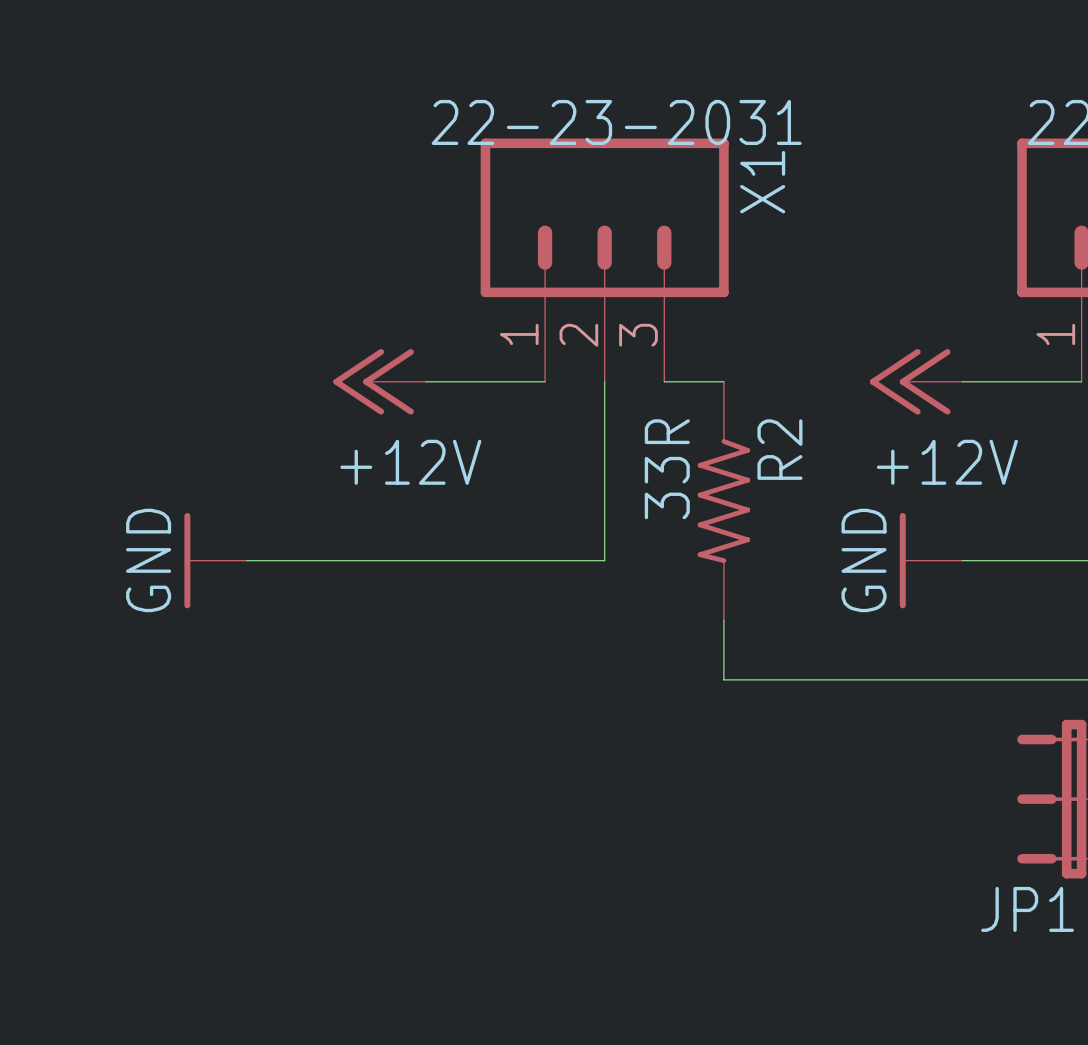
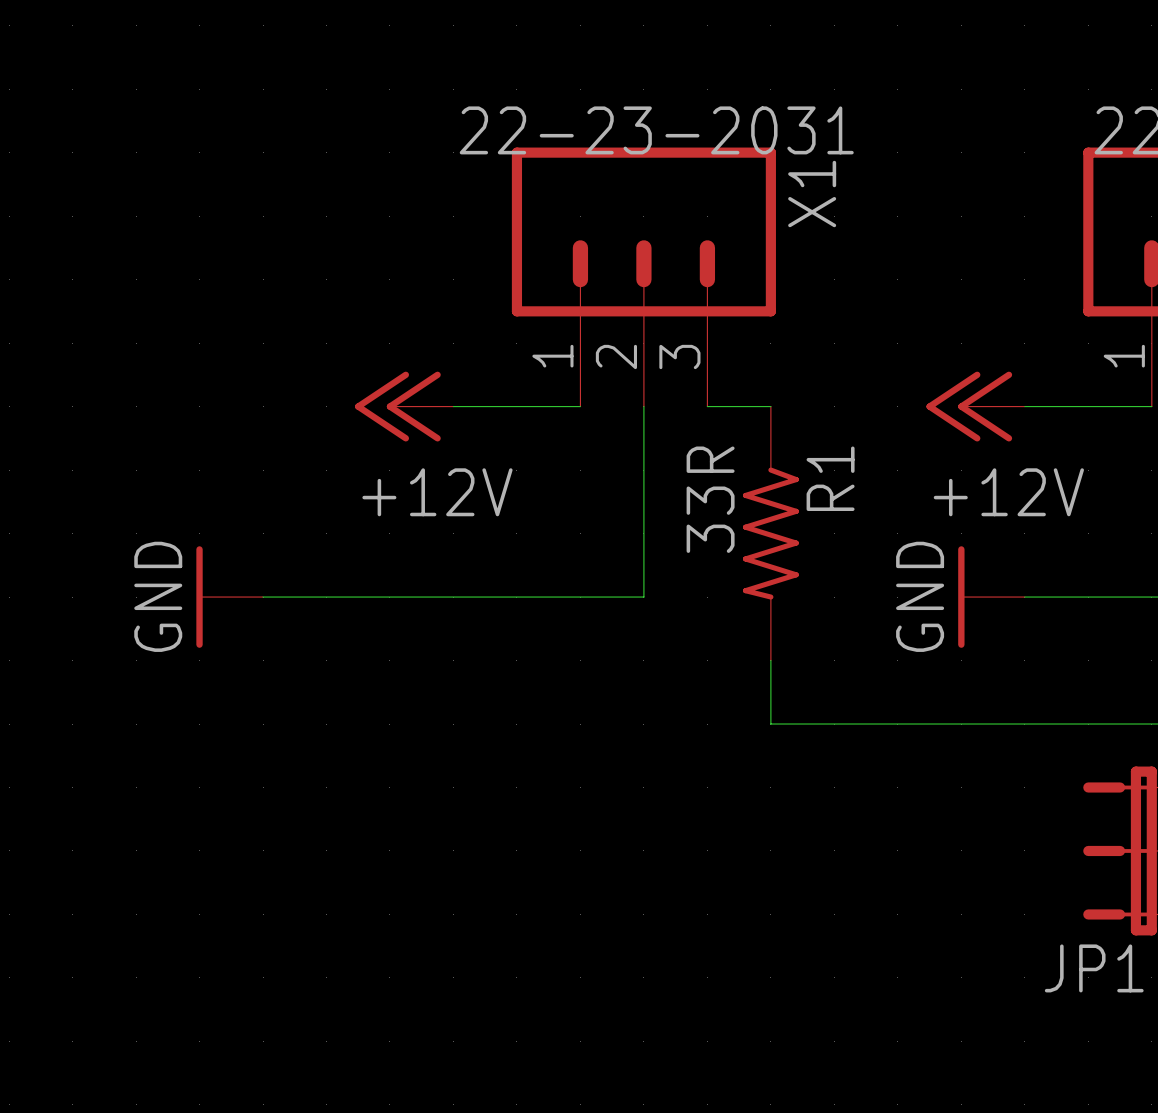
R2 name: R2 (779, 449) -> R1 (830, 478)

